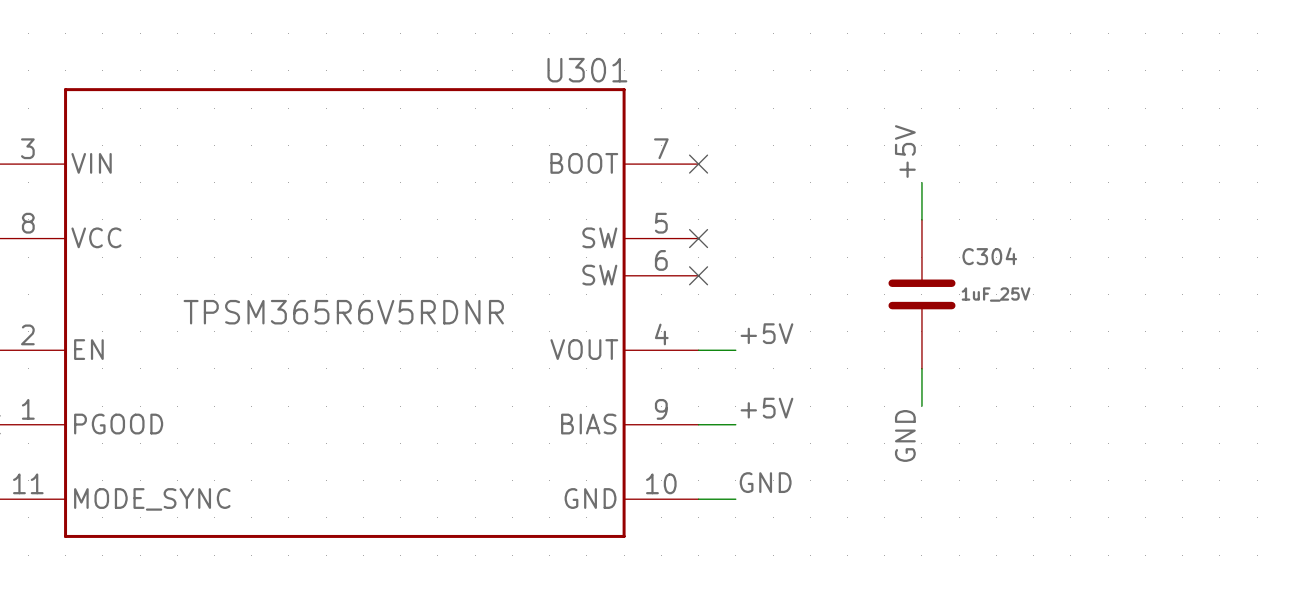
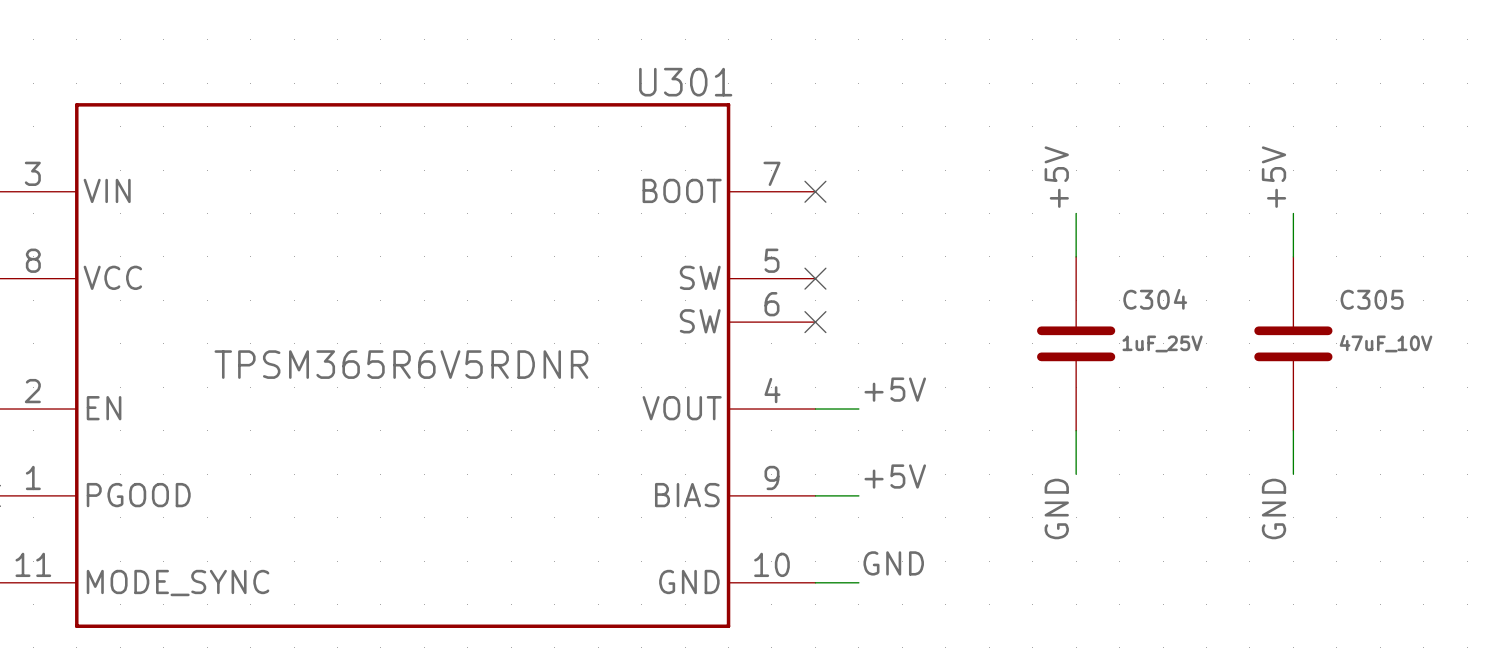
label: none -> +5V (1274, 177)
wire: none -> (1293, 213) (1293, 256)
C305: none -> 47uF_10V (1293, 343)
wire: none -> (1293, 430) (1293, 474)
label: none -> GND (1274, 508)

